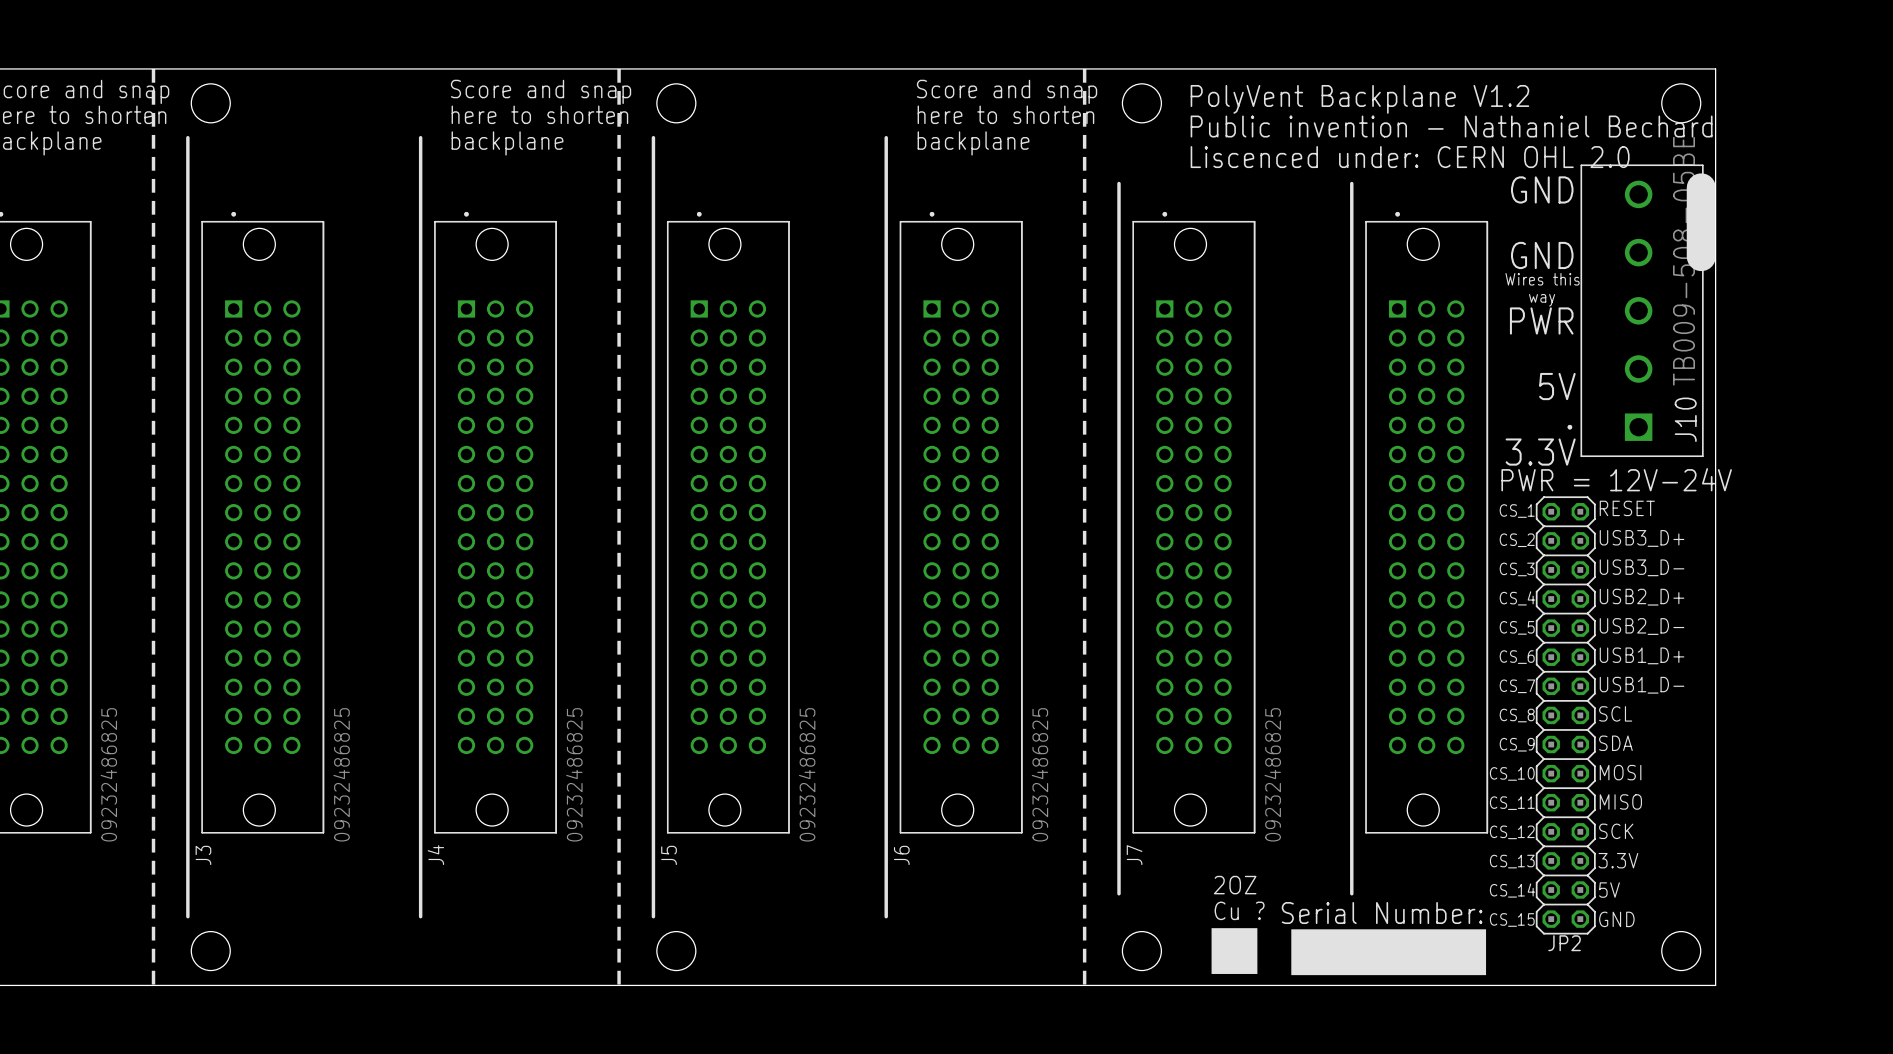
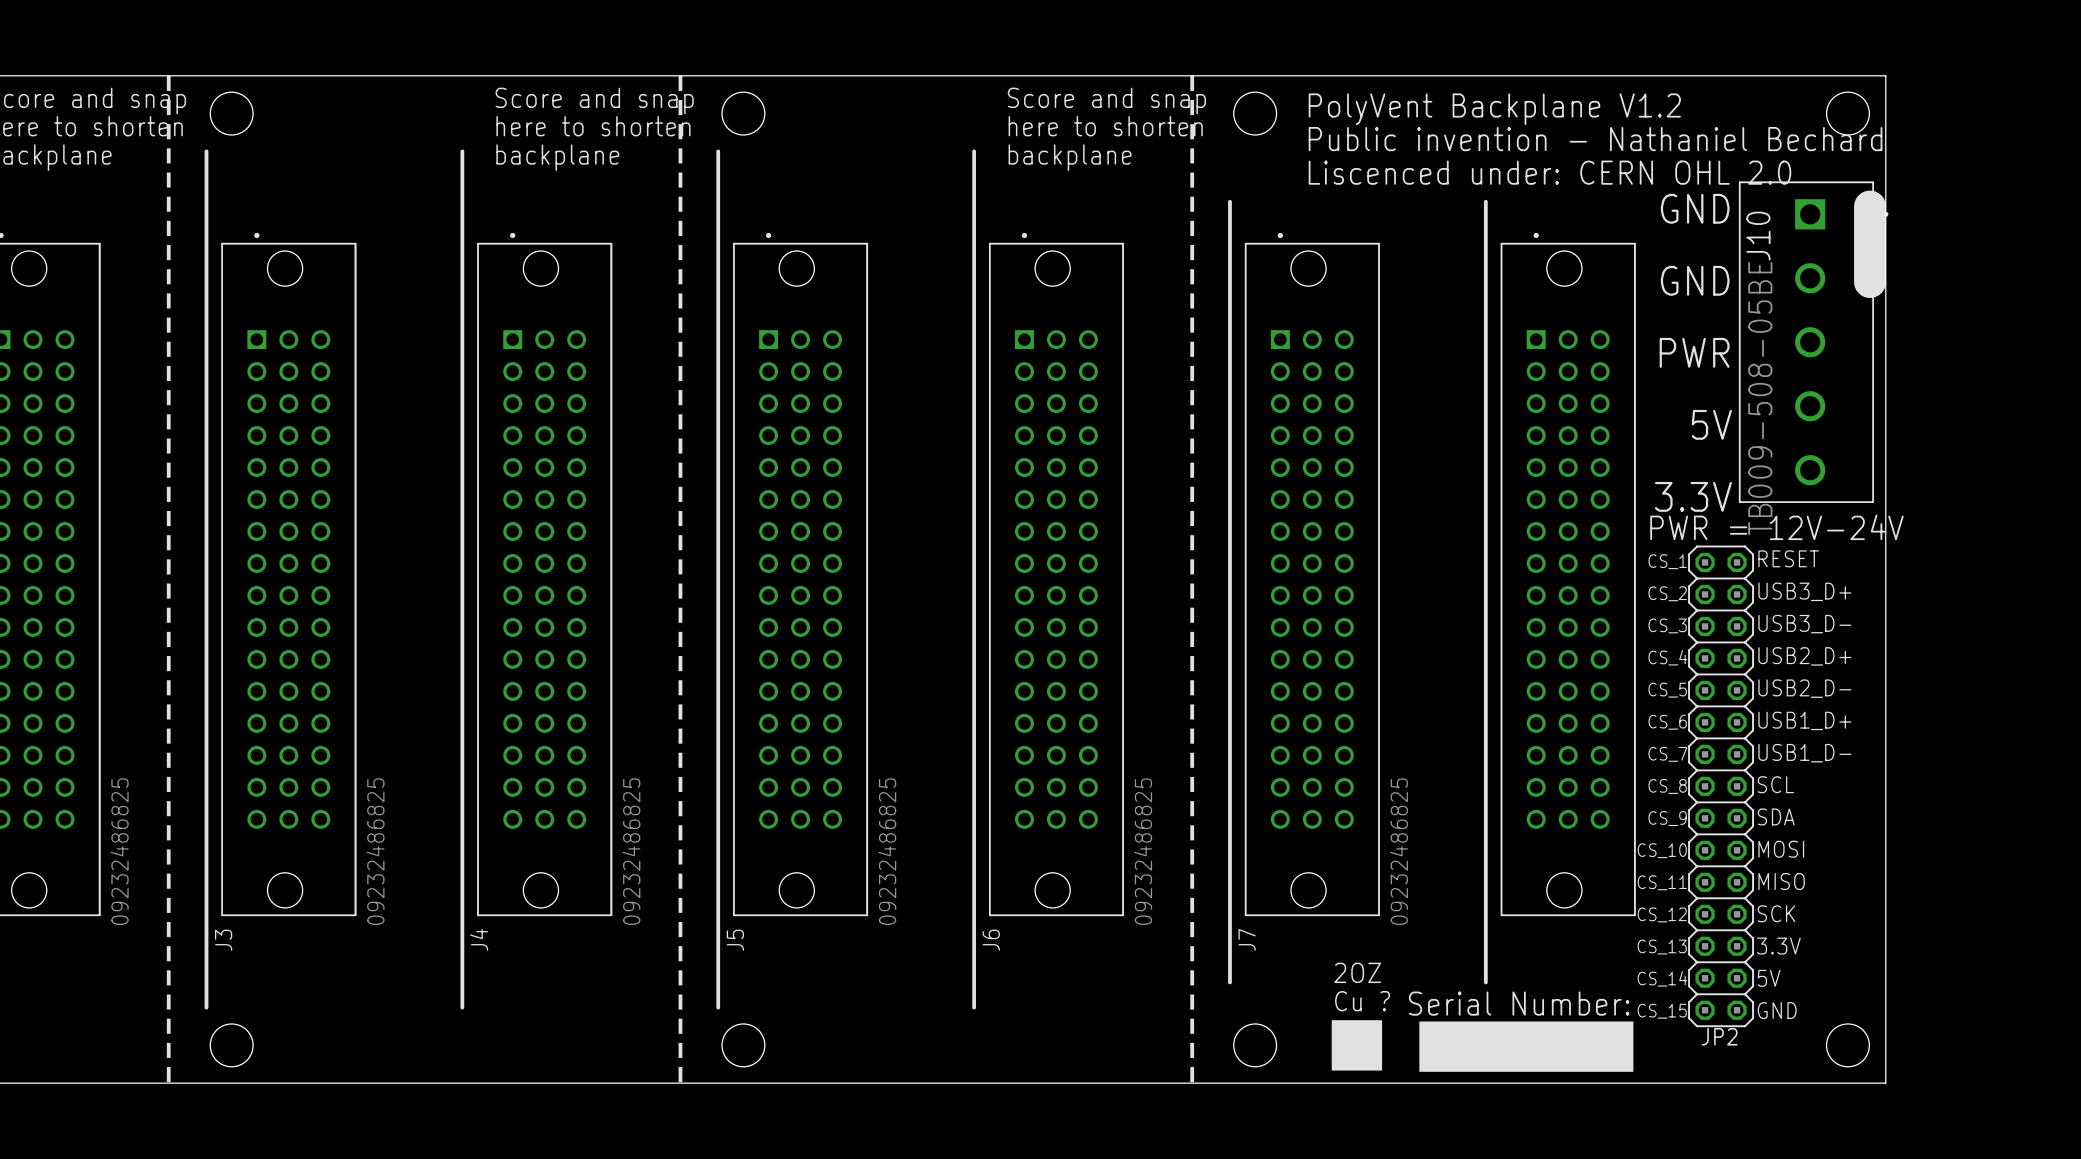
text: Wires this (1542, 279) -> none
text: way (1542, 300) -> none
J10 rotation: 0° (1635, 310) -> 180° (1813, 342)

